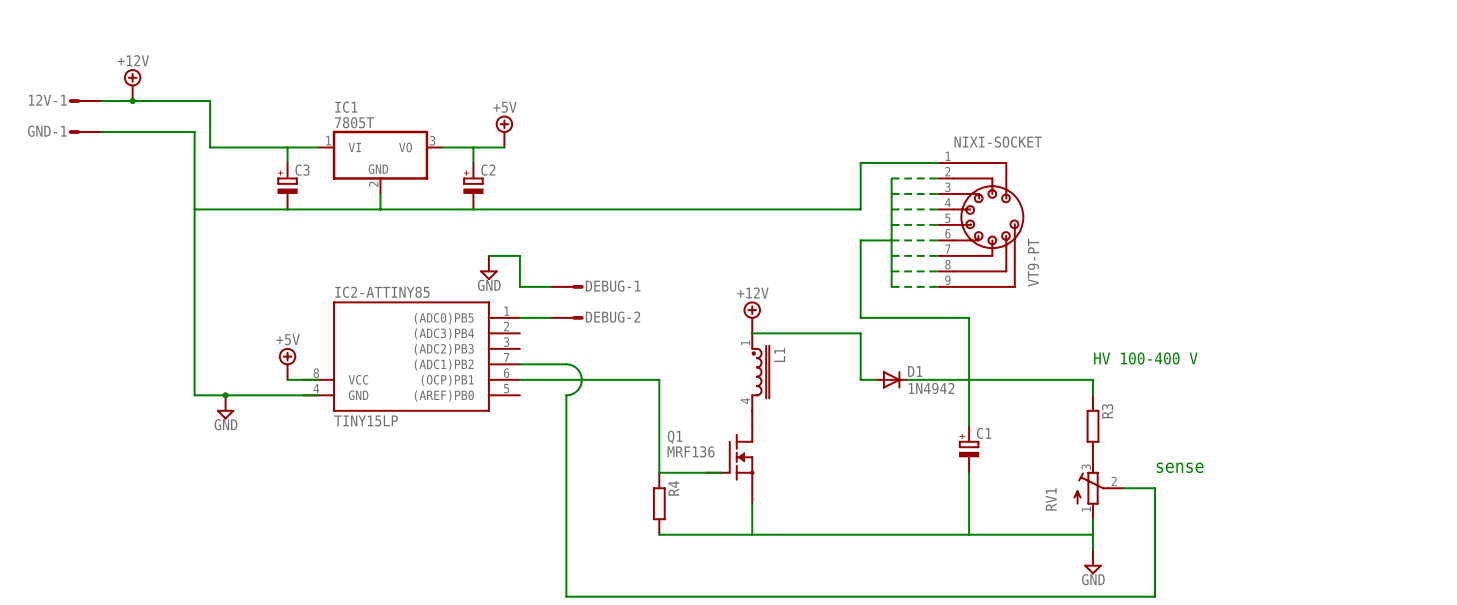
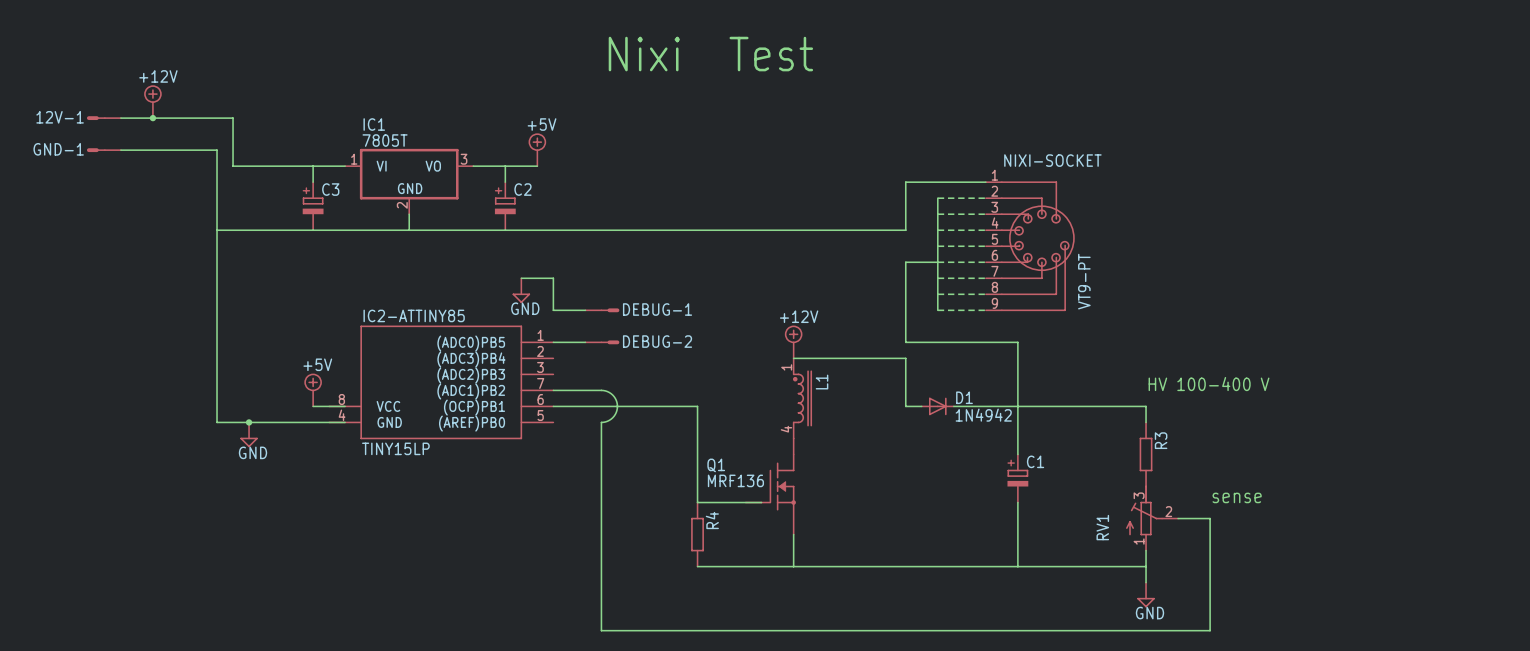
text: none -> Nixi Test (710, 54)

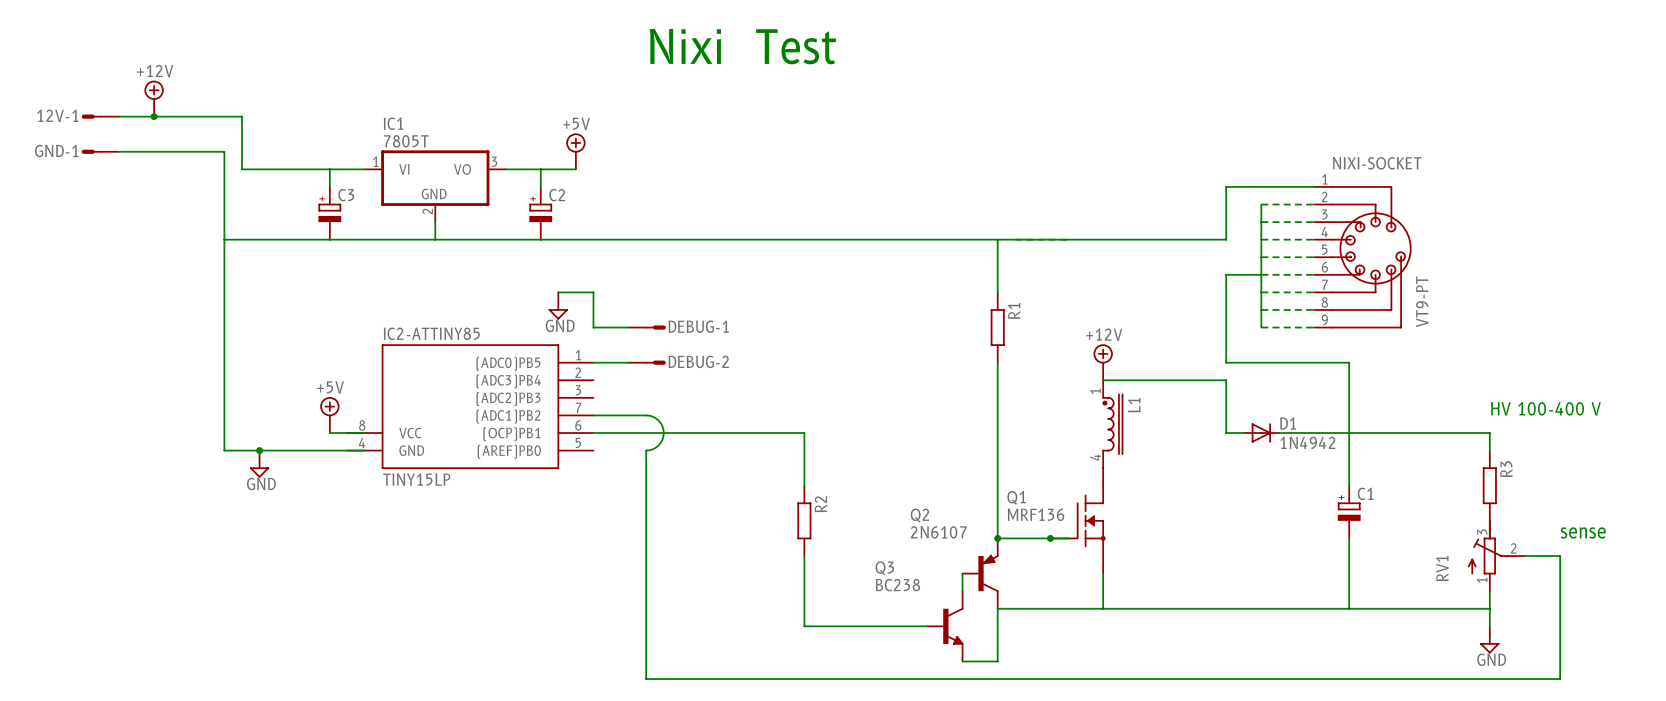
wire: (985, 182) (905, 182) (905, 230) -> (1314, 186) (1226, 186) (1226, 239) (980, 239)
wire: (985, 198) (937, 198) (937, 310) (985, 310) -> none
wire: none -> (1314, 204) (1261, 204) (1261, 327) (1314, 327)
wire: (937, 214) (985, 214) -> none
wire: none -> (1261, 222) (1314, 222)
wire: none -> (997, 239) (997, 292)
wire: none -> (1261, 239) (1314, 239)
wire: (937, 246) (985, 246) -> none
NIXI-SOCKET: VT9-PT (1030, 246) -> none
wire: none -> (1261, 257) (1314, 257)
NIXI-SOCKET: none -> VT9-PT (1362, 257)
wire: (985, 262) (905, 262) (905, 342) (1017, 342) (1017, 454) -> none
wire: none -> (1314, 274) (1226, 274) (1226, 362) (1349, 362) (1349, 485)
wire: (937, 278) (985, 278) -> none
wire: none -> (1261, 292) (1314, 292)
wire: (937, 294) (985, 294) -> none
wire: none -> (1261, 309) (1314, 309)
R1: none -> (997, 327)
power symbol: +12V (793, 341) -> none
power symbol: none -> +12V (1103, 362)
wire: none -> (997, 362) (997, 538) (1068, 538)
wire: (793, 358) (905, 358) (905, 406) (921, 406) -> none
text: HV 100-400 V (1209, 384) -> none
text: none -> HV 100-400 V (1545, 408)
L1 position: (802, 398) -> (1112, 424)
wire: (697, 406) (697, 502) (761, 502) -> (751, 432) (804, 432) (804, 485)
D1 position: (937, 406) -> (1261, 432)
wire: (953, 406) (1130, 406) -> (1103, 380) (1226, 380) (1226, 432)
wire: (1146, 406) (1146, 422) -> none
wire: none -> (1278, 432) (1489, 432) (1489, 450)
R3 position: (1146, 454) -> (1489, 485)
C1 position: (1017, 478) -> (1349, 512)
R2: none -> (804, 520)
Q1 position: (770, 486) -> (1078, 520)
text: sense (1237, 497) -> none
text: none -> sense (1583, 532)
junction: none -> (997, 538)
junction: none -> (1050, 538)
wire: none -> (1349, 538) (1349, 608)
wire: none -> (804, 556) (804, 626) (927, 626)
RV1 position: (1152, 518) -> (1496, 555)
wire: (1178, 518) (1210, 518) (1210, 630) -> (1524, 556) (1560, 556) (1560, 679) (1314, 679)
R4: (697, 534) -> none
wire: (793, 534) (793, 566) -> none
wire: none -> (962, 573) (962, 591)
Q2: none -> 2N6107 (980, 573)
wire: (1146, 550) (1146, 582) -> none
wire: none -> (1489, 591) (1489, 626)
wire: (697, 566) (921, 566) -> (962, 661) (997, 661) (997, 608)
wire: none -> (1243, 608) (1489, 608)
Q3: none -> BC238 (945, 626)
power symbol: GND (1146, 595) -> none
power symbol: none -> GND (1489, 639)

